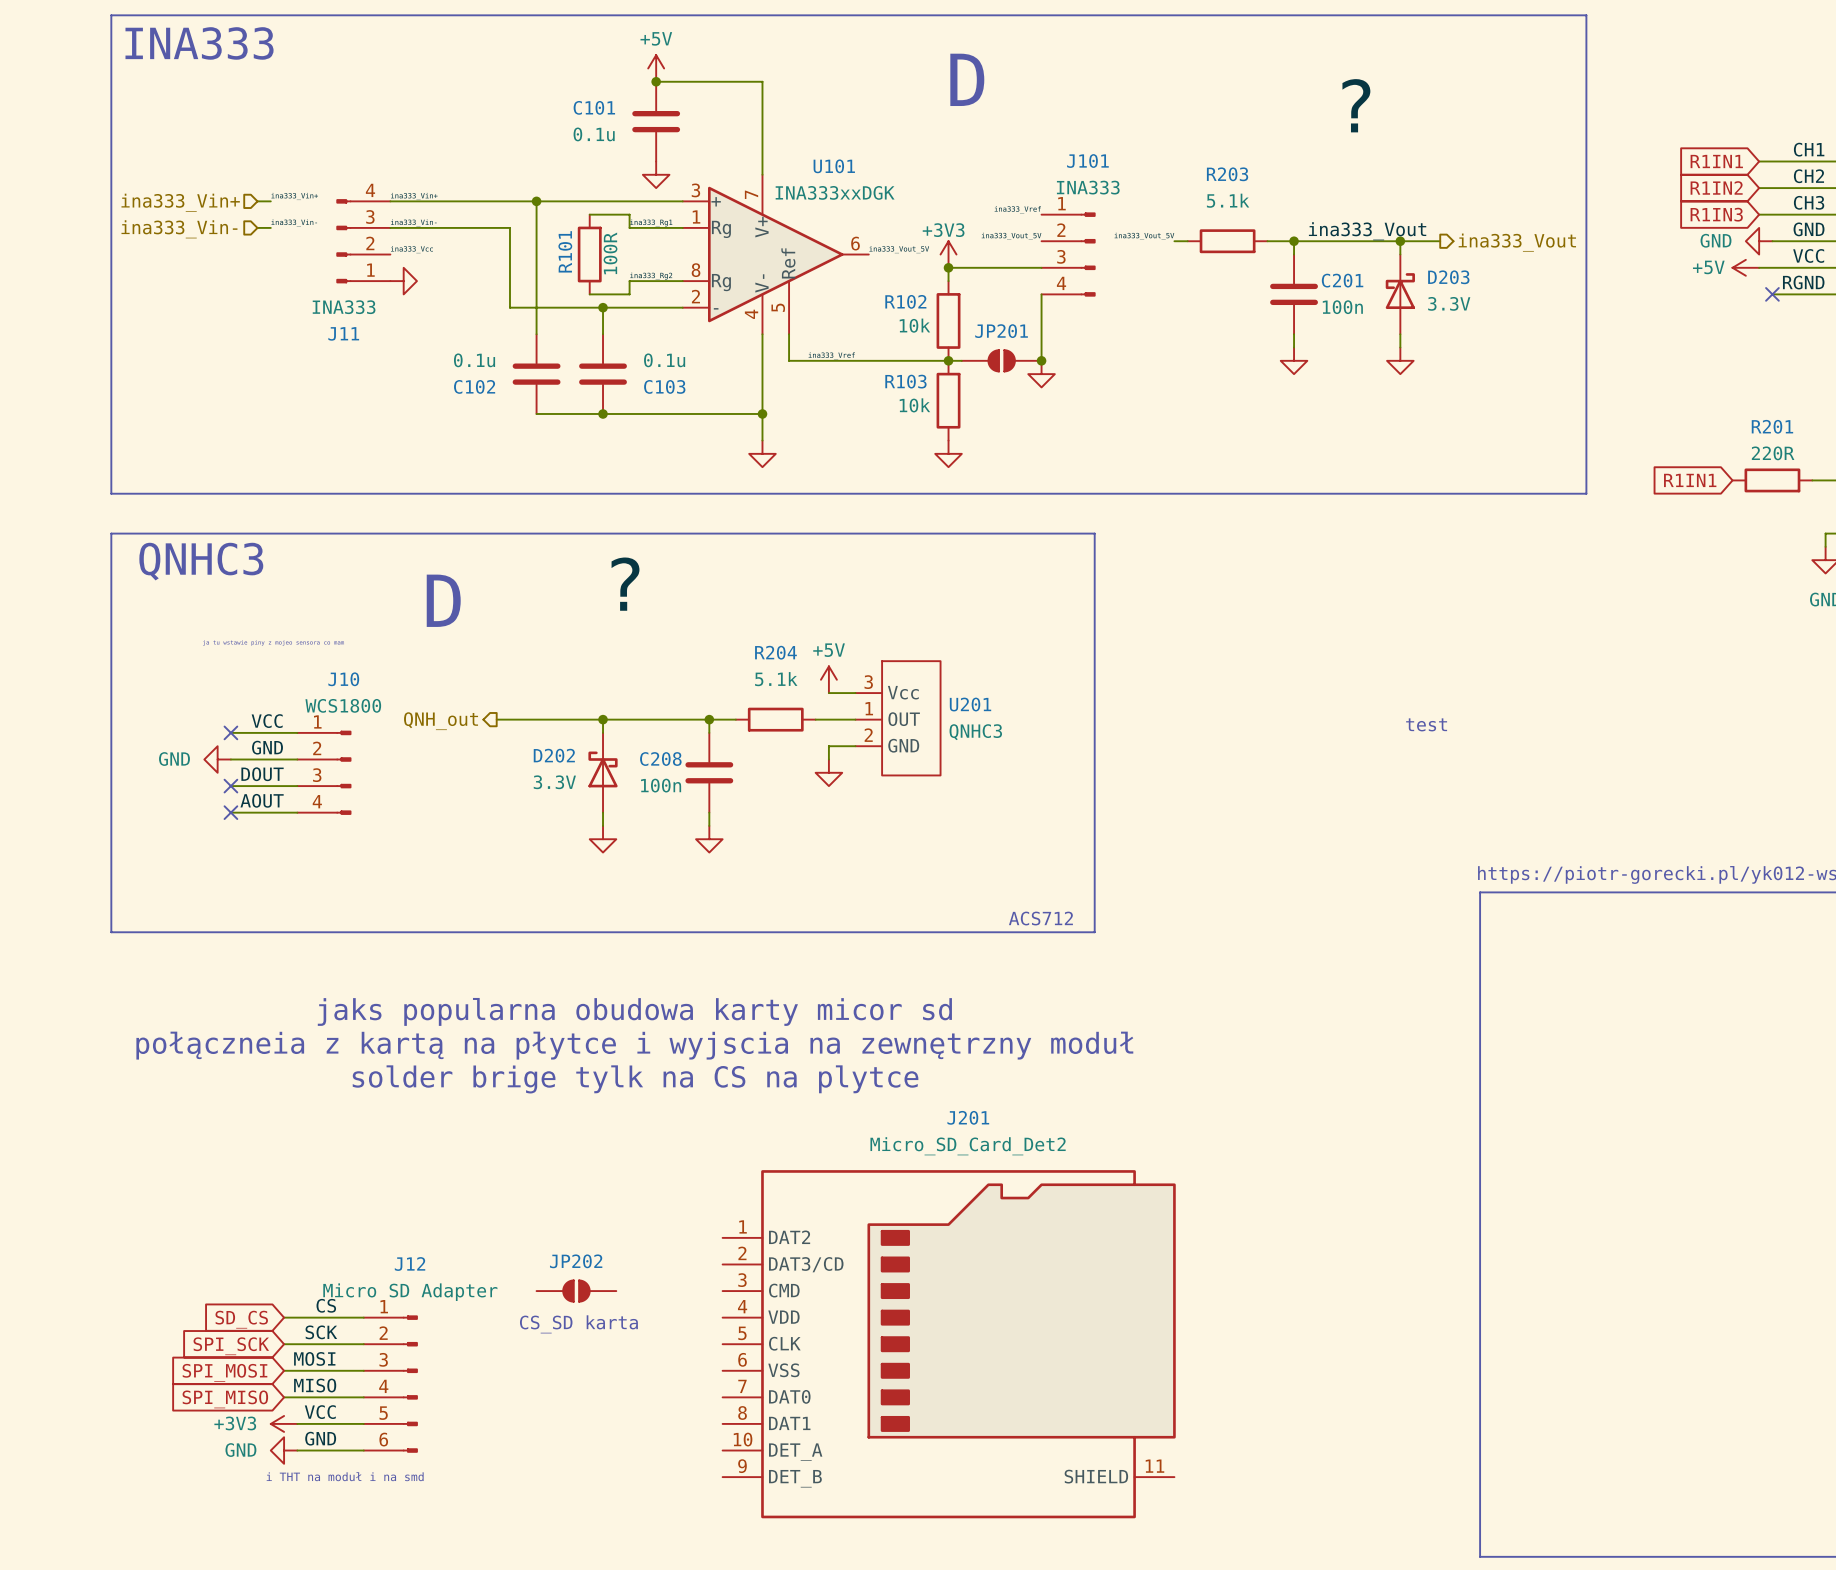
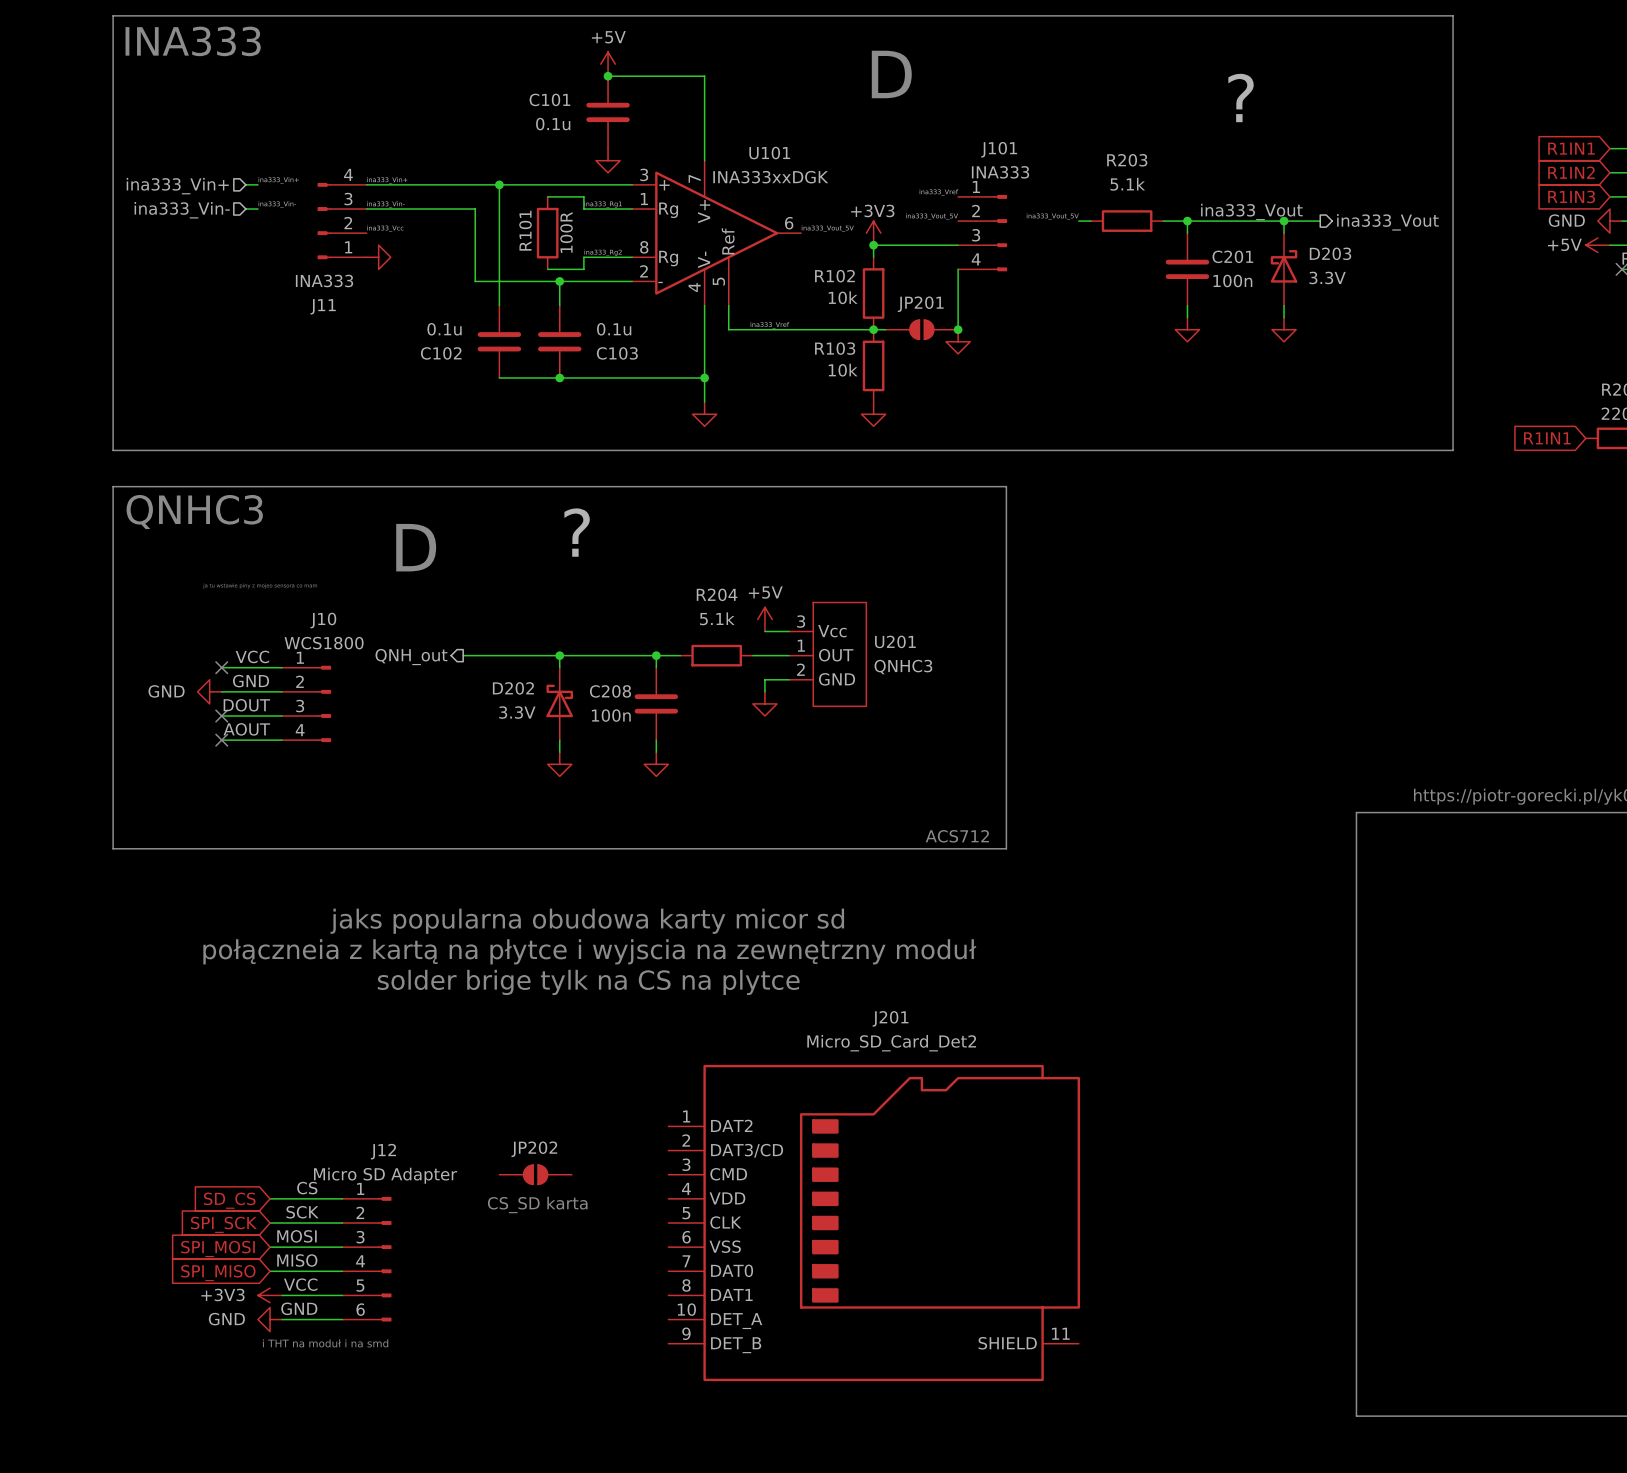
text: test (1426, 724) -> none

